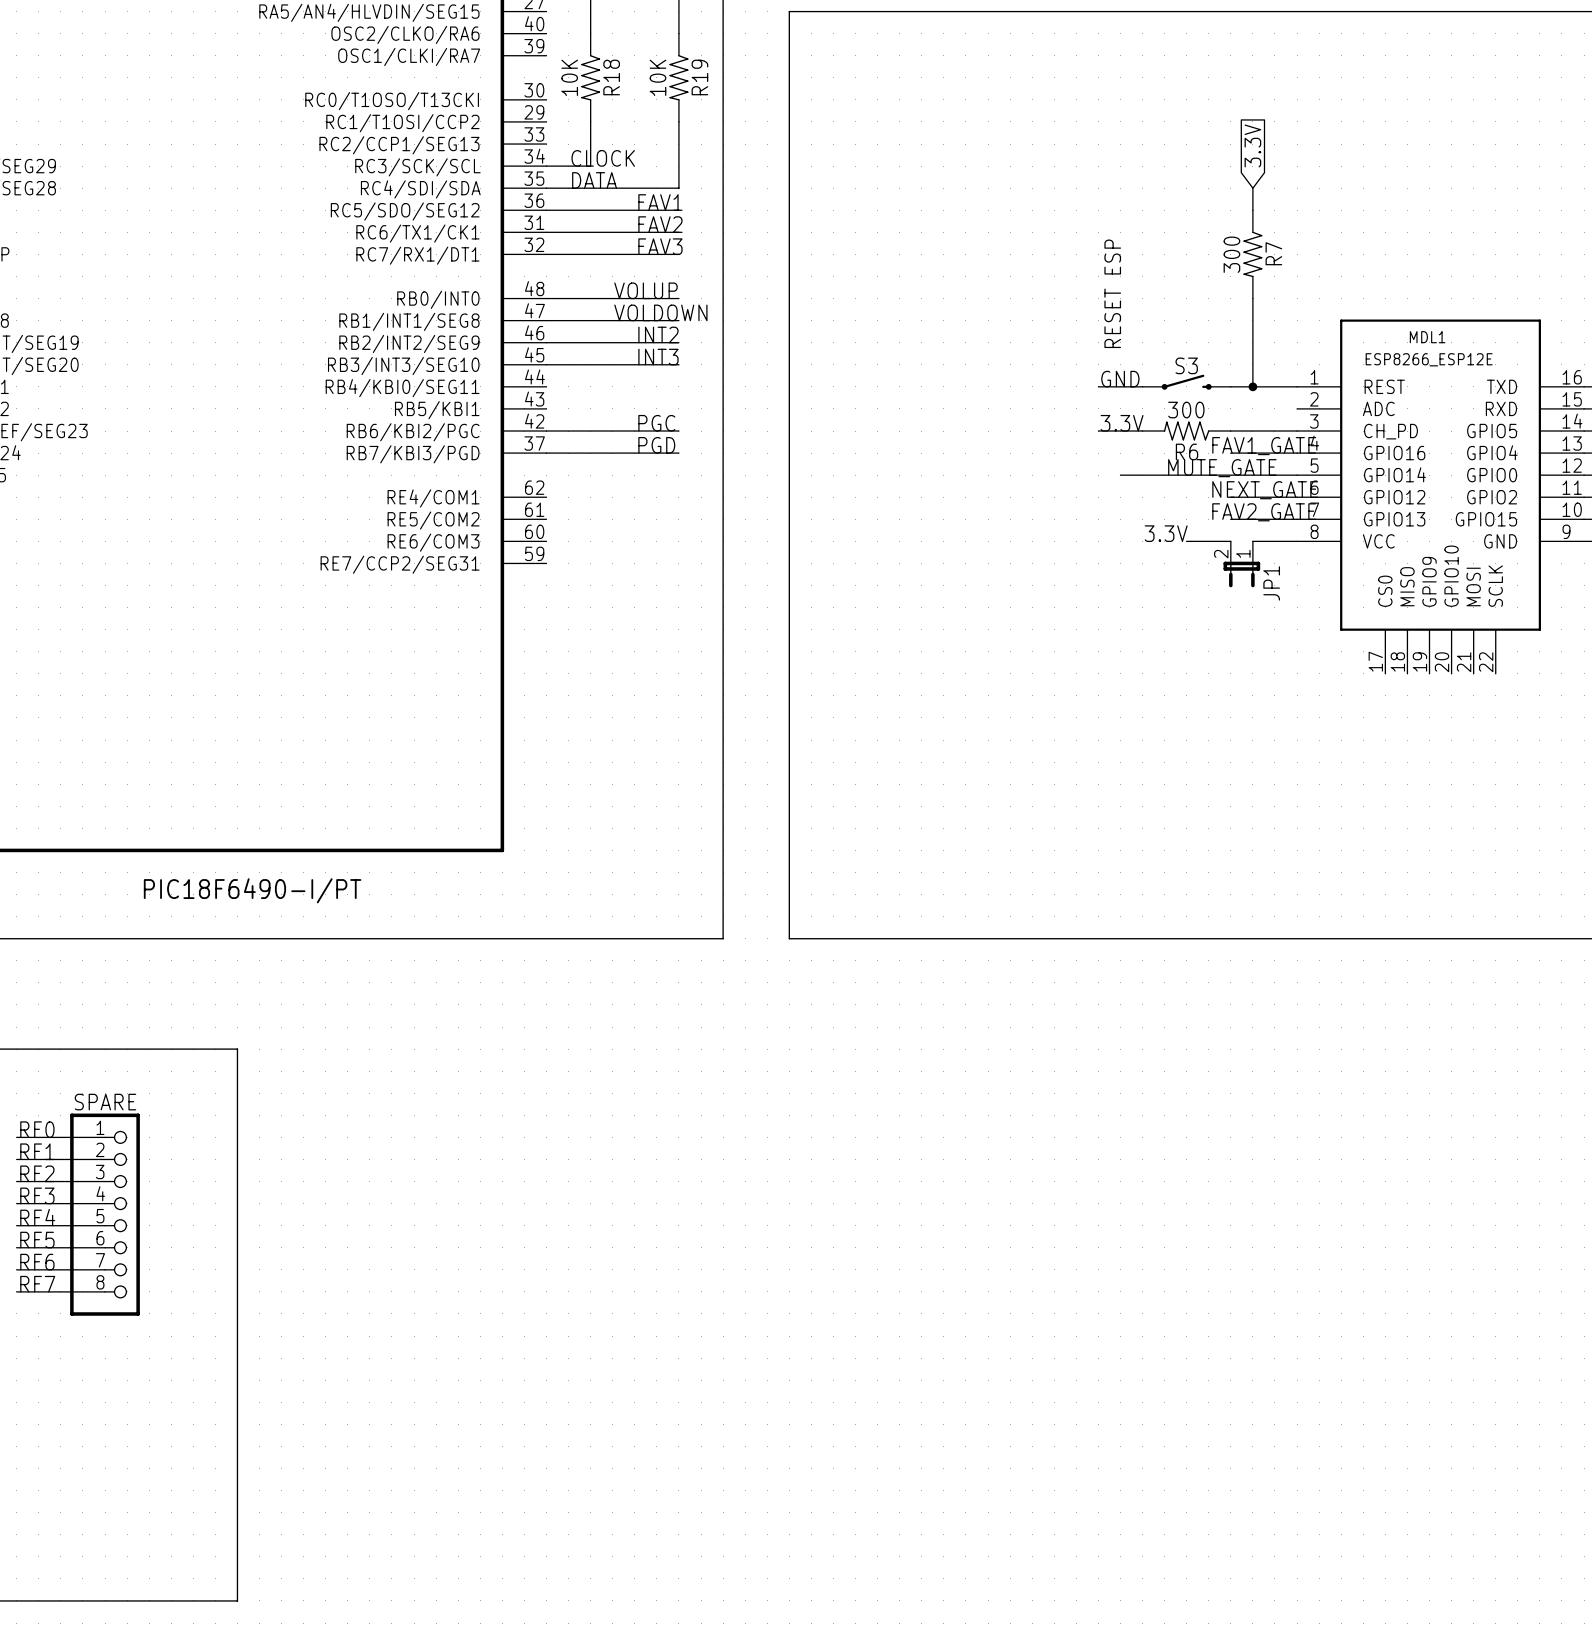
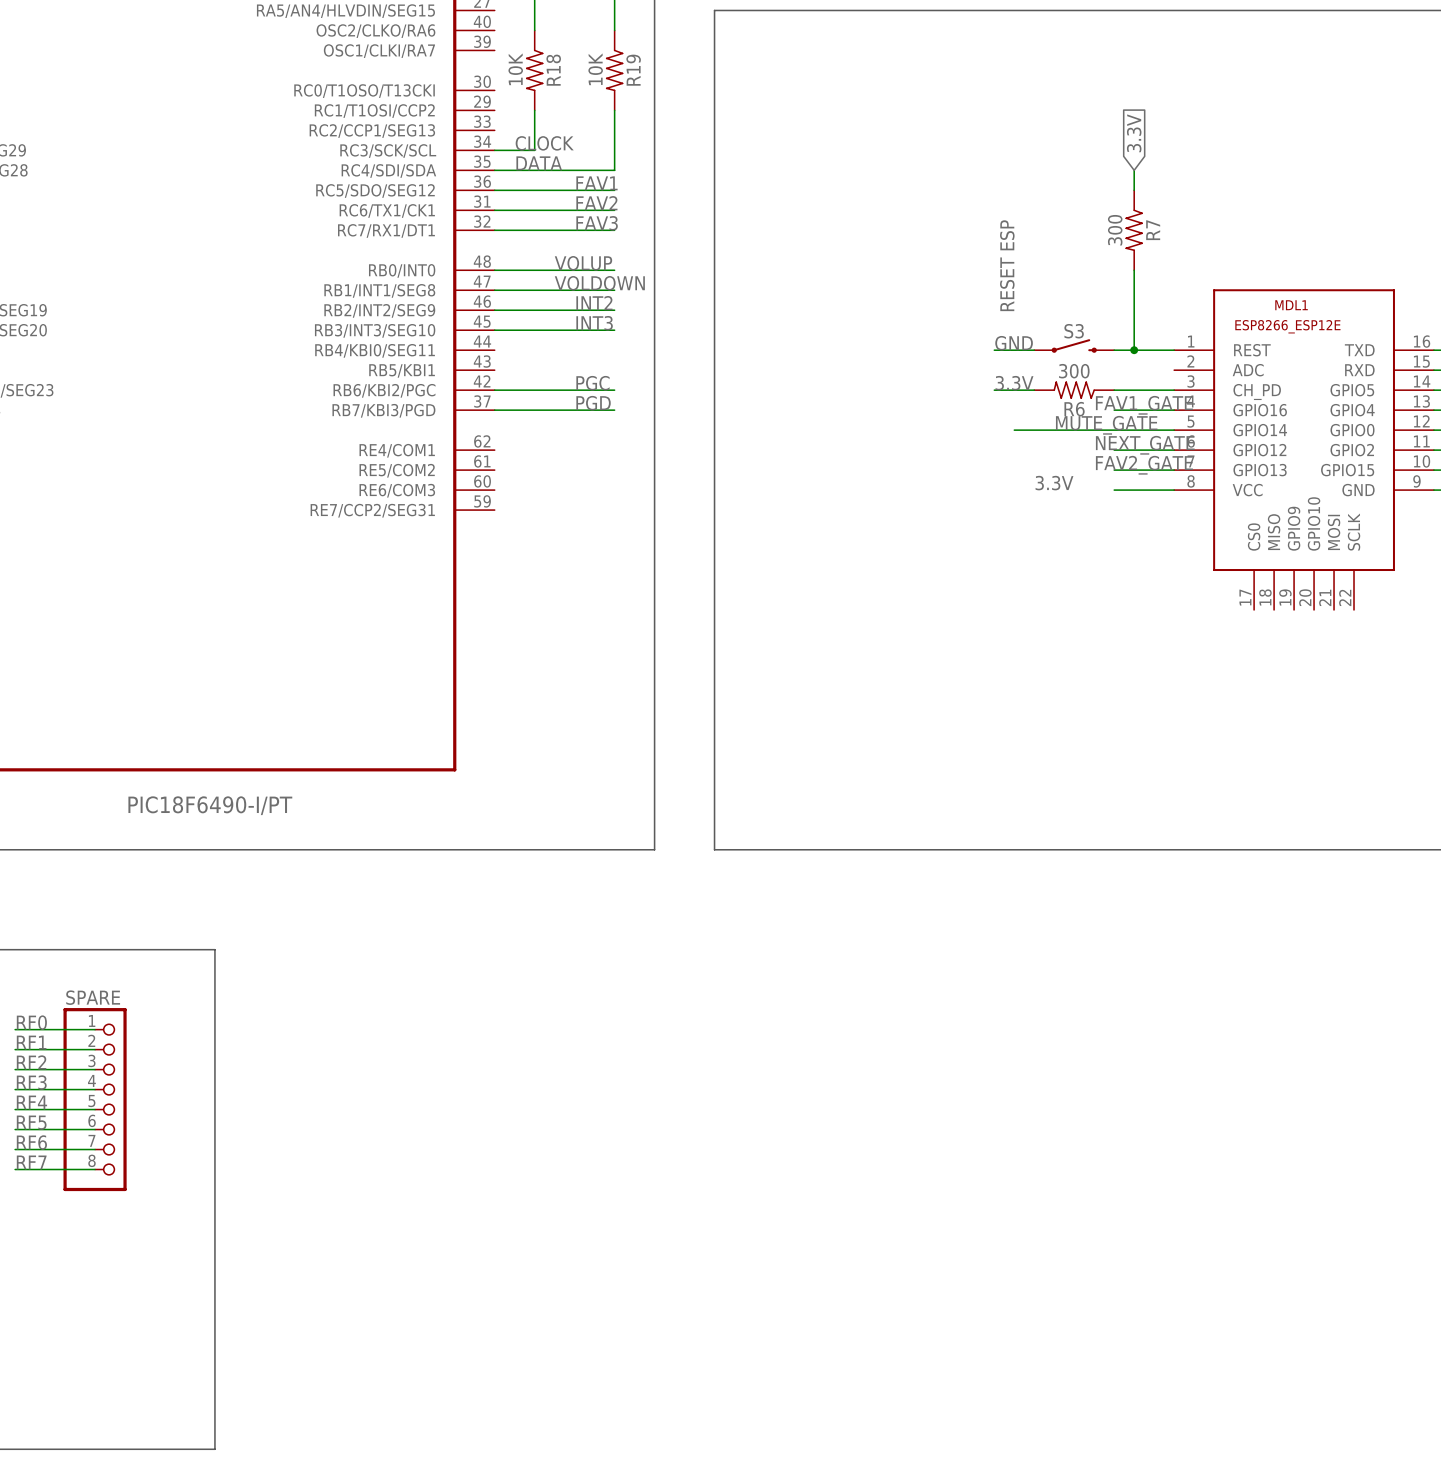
wire: (1186, 541) (1230, 541) -> (1134, 490) (1114, 490)
JP1: (1241, 564) -> none

